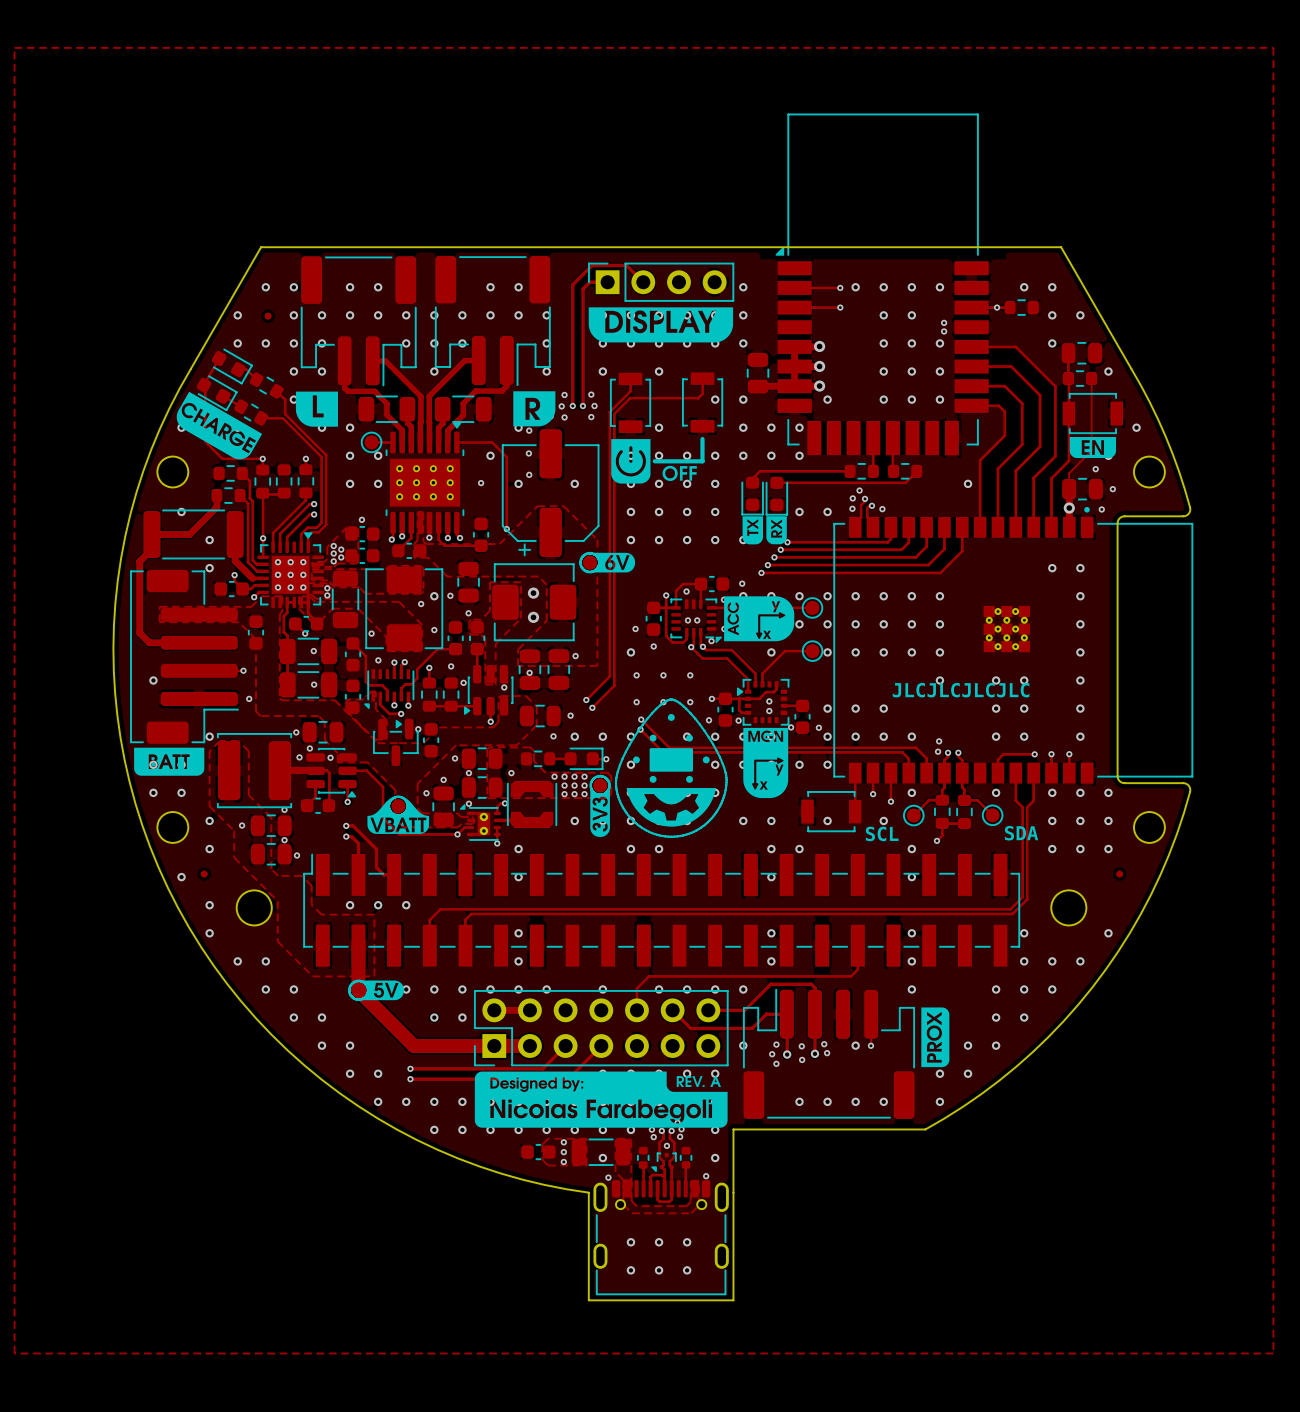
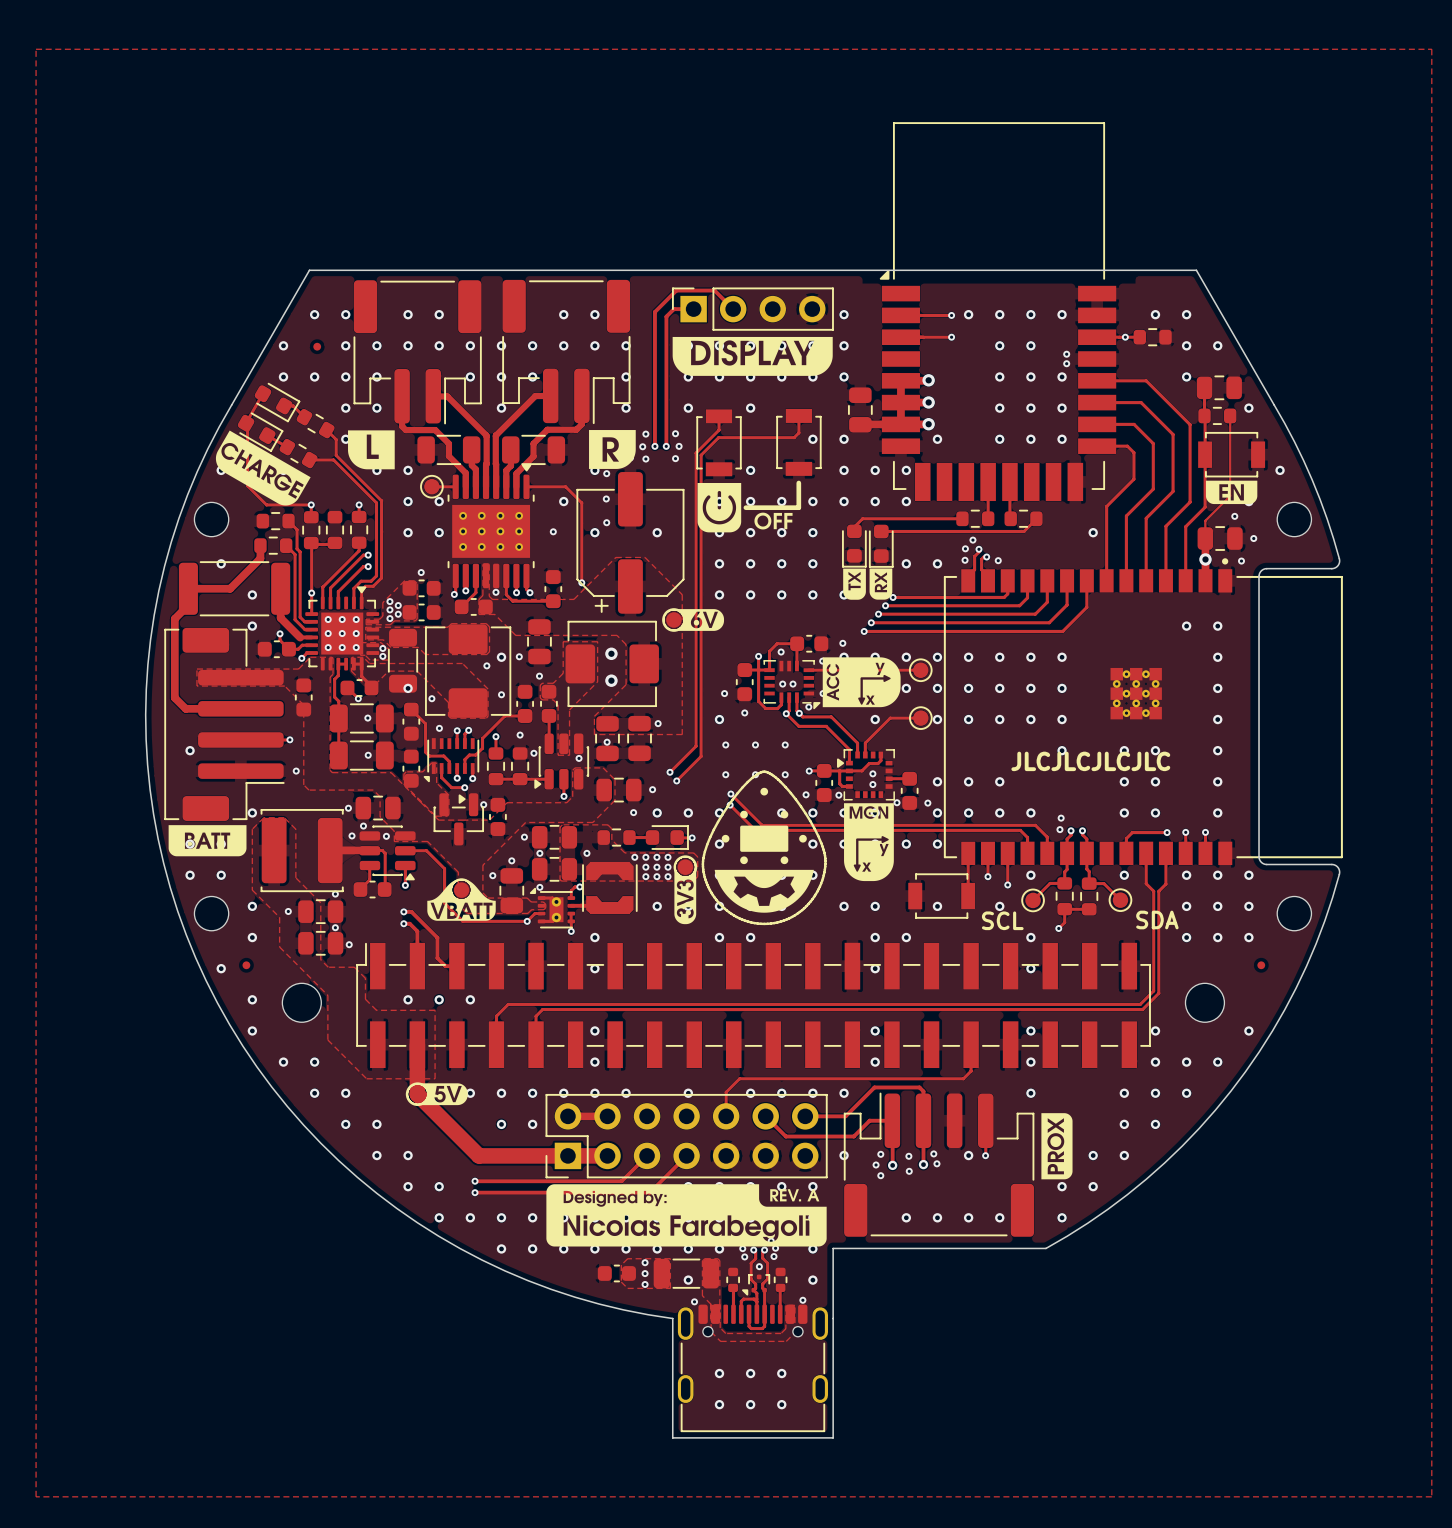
via: none -> (408, 688)

